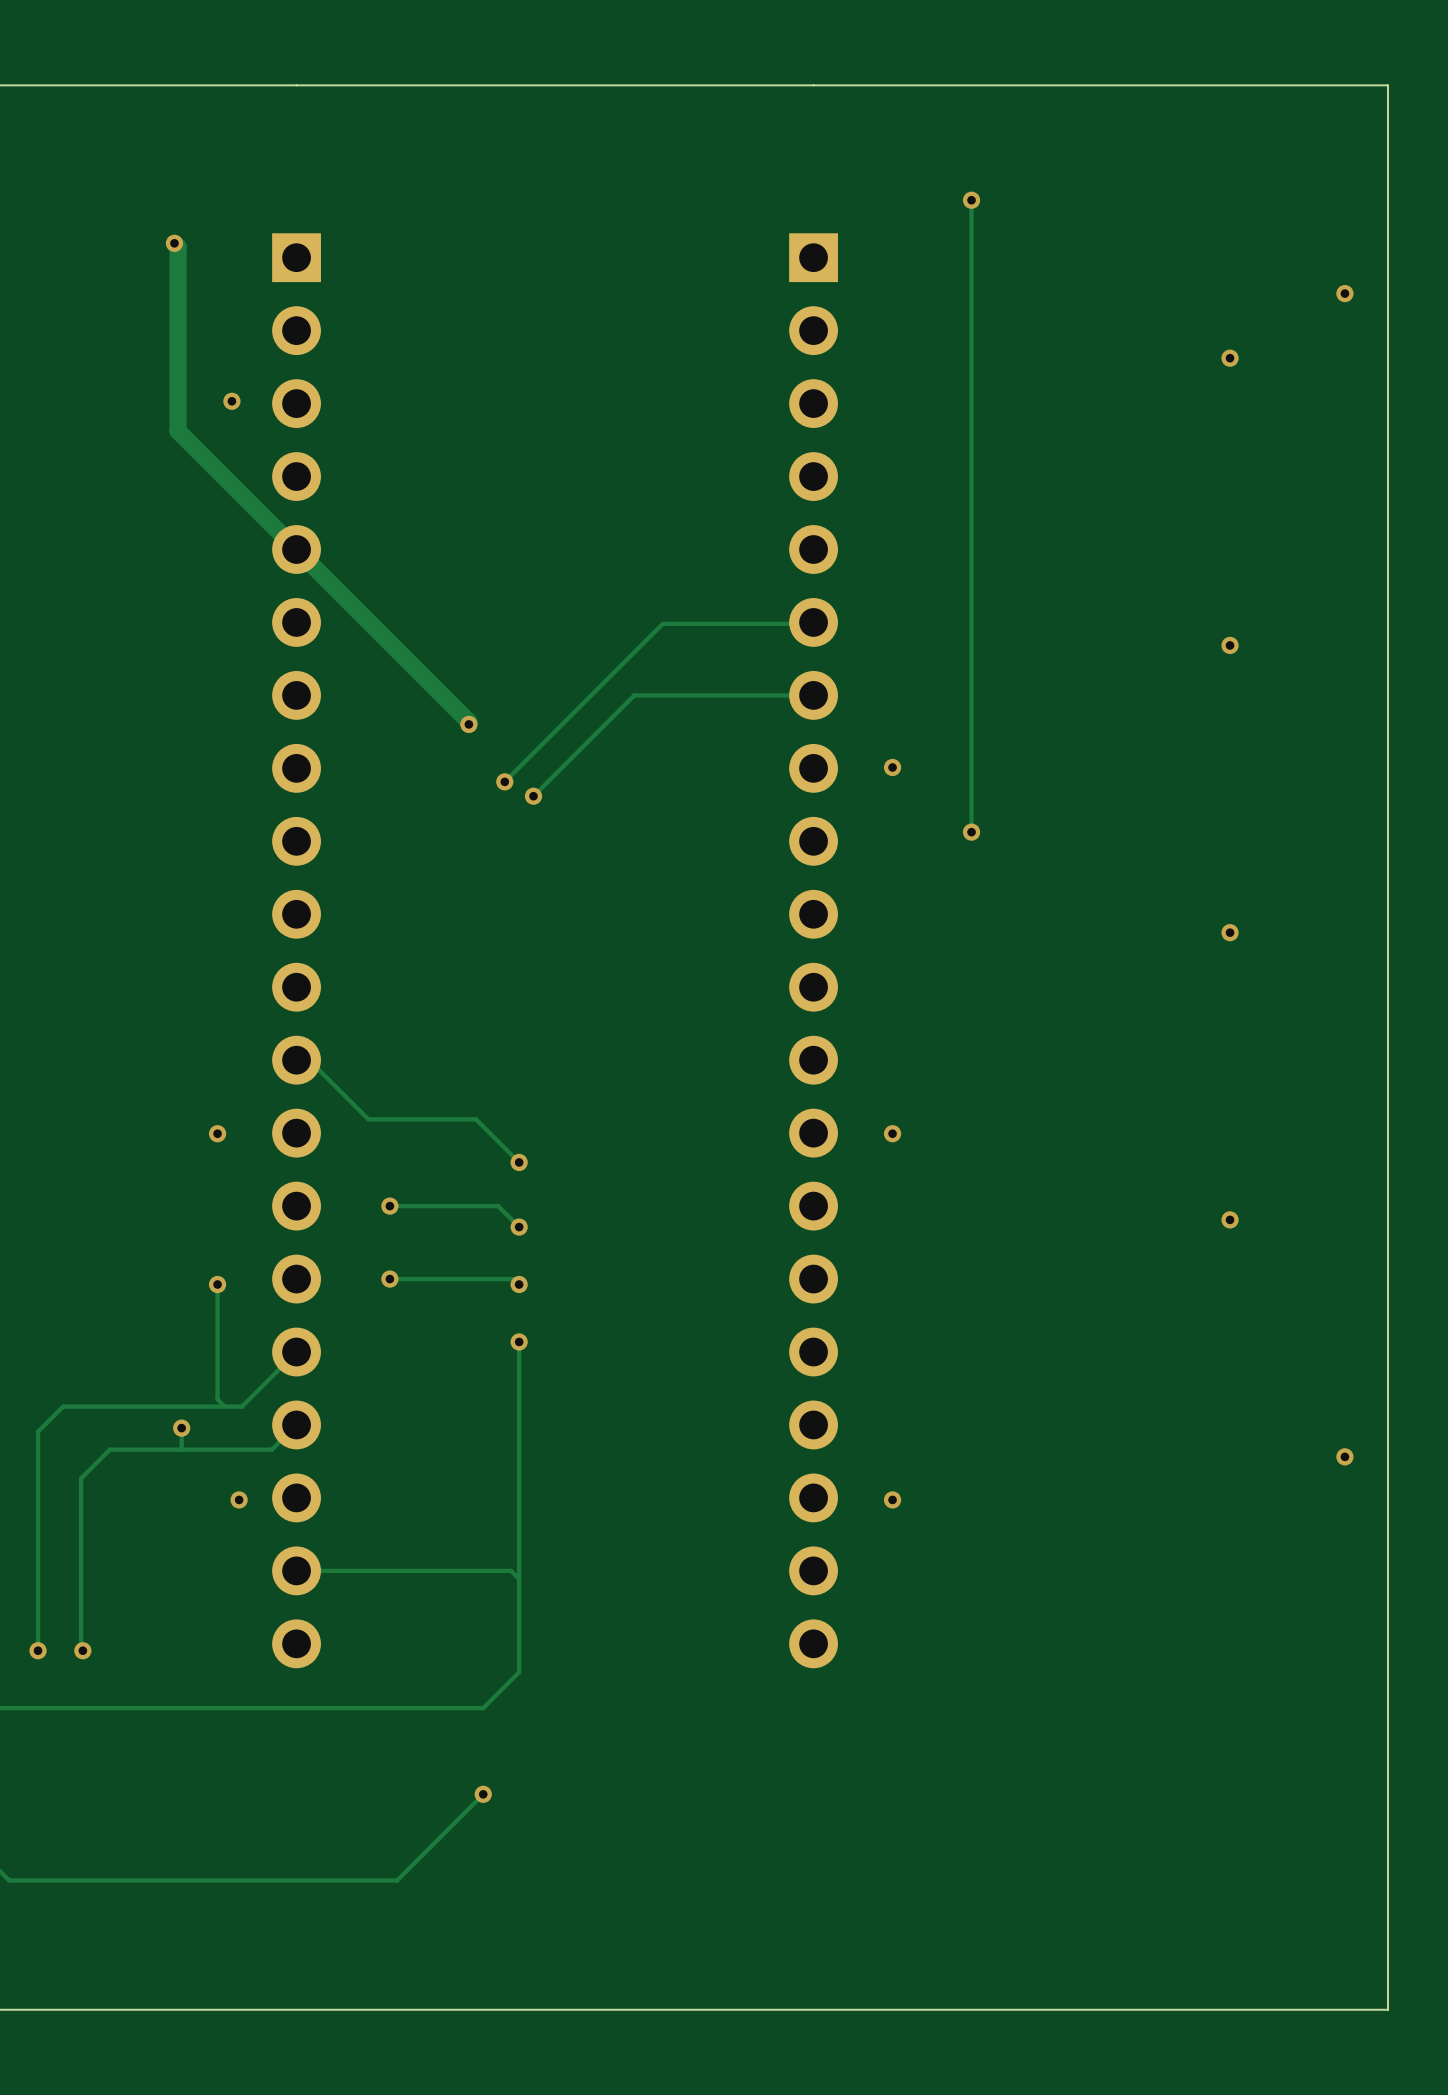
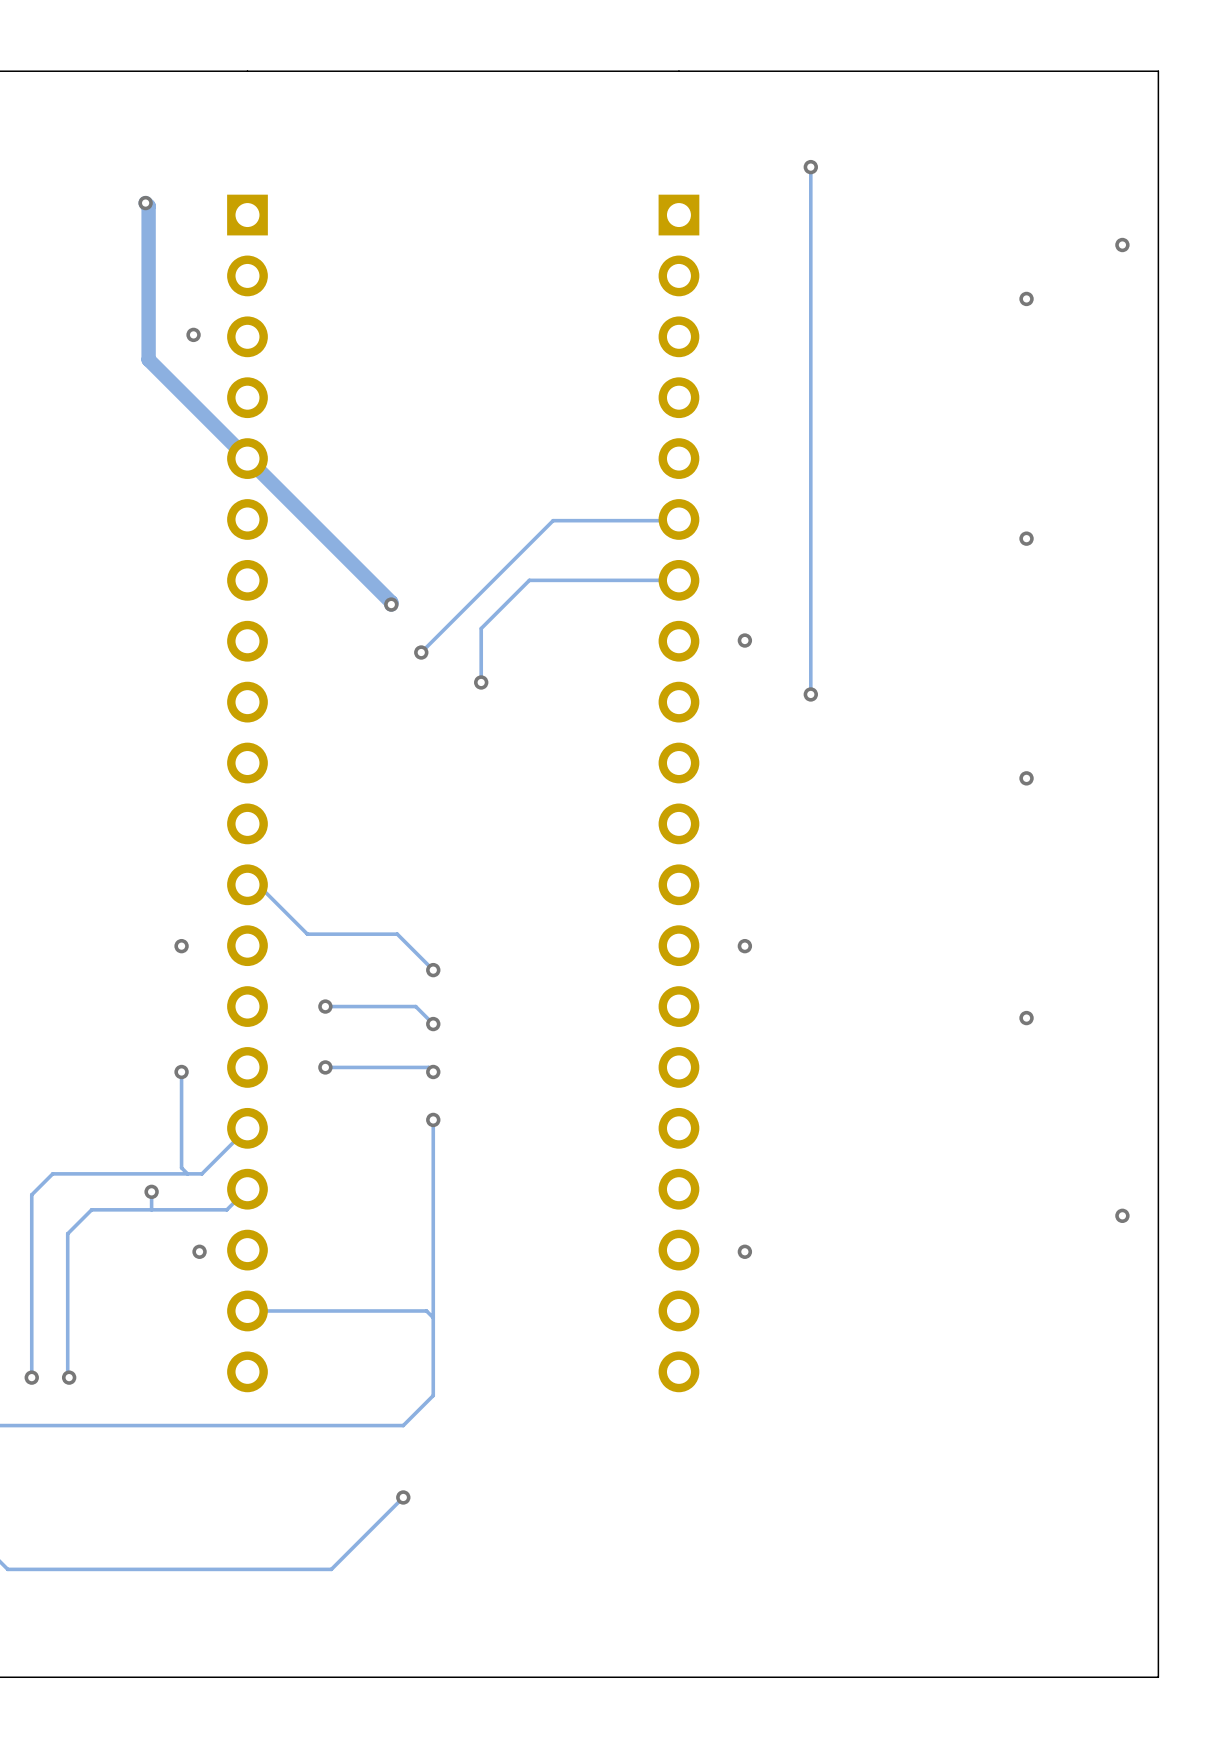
track: (576, 753) (533, 796) -> (481, 628) (481, 682)
via position: (533, 796) -> (481, 682)

